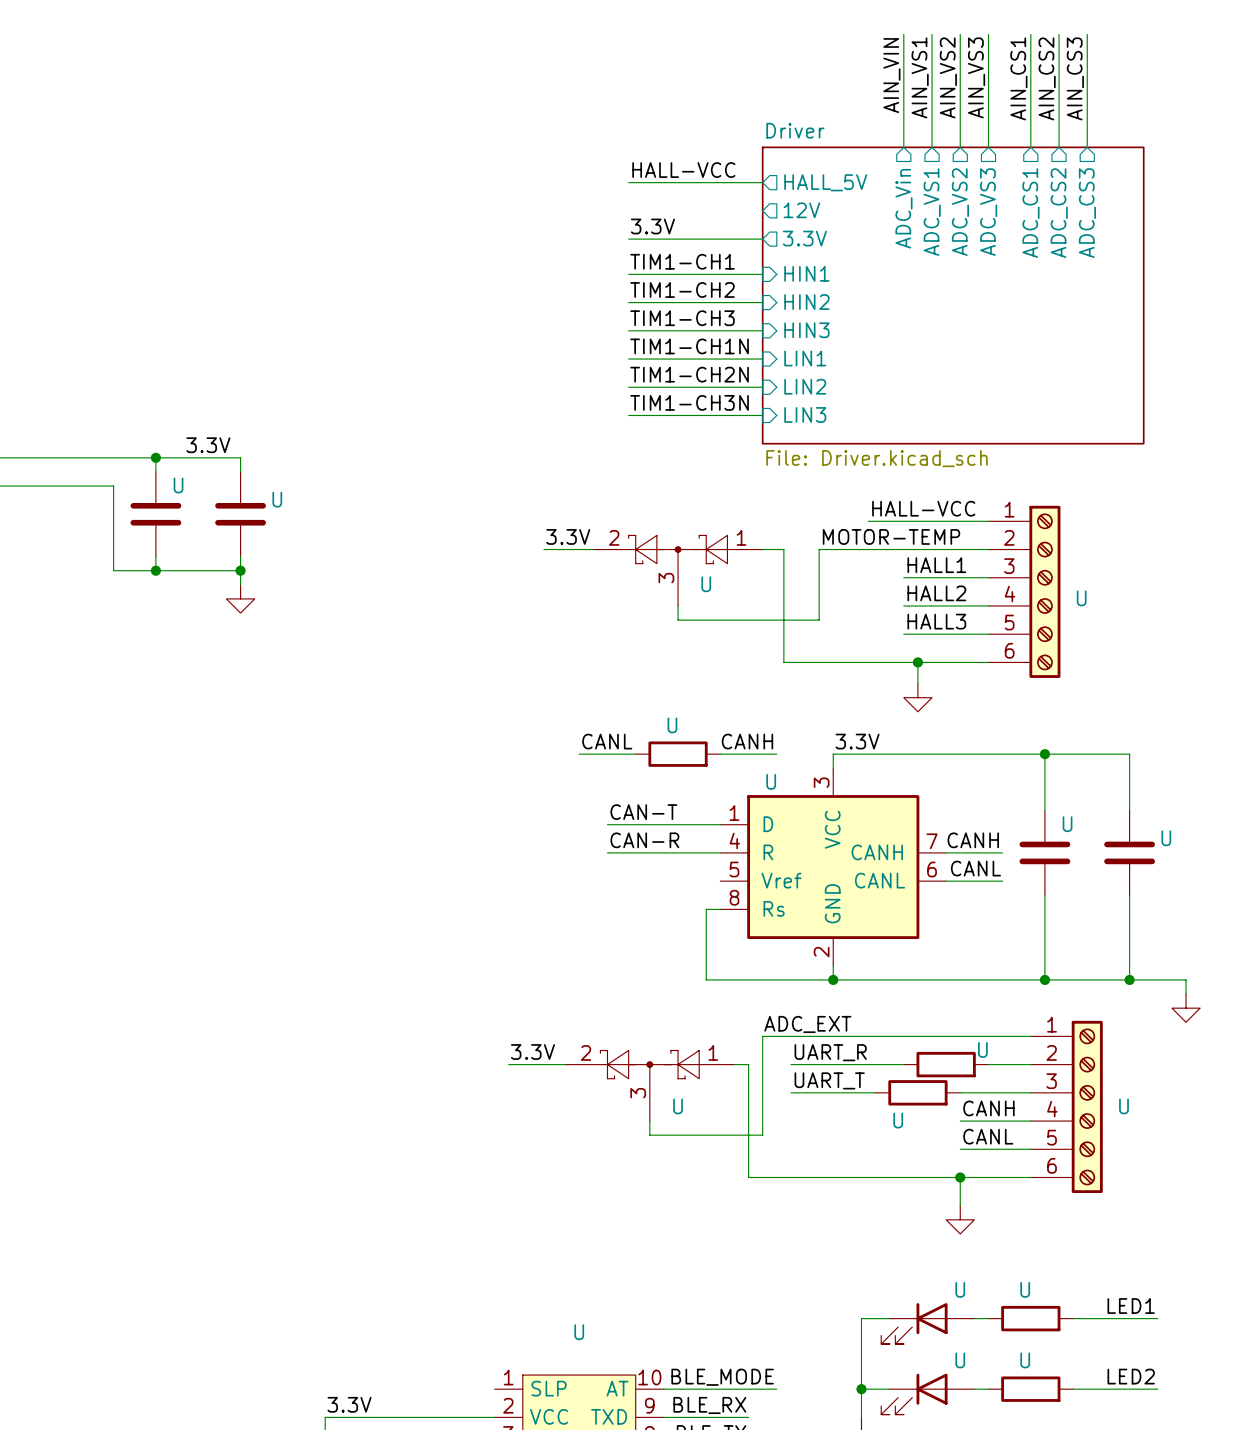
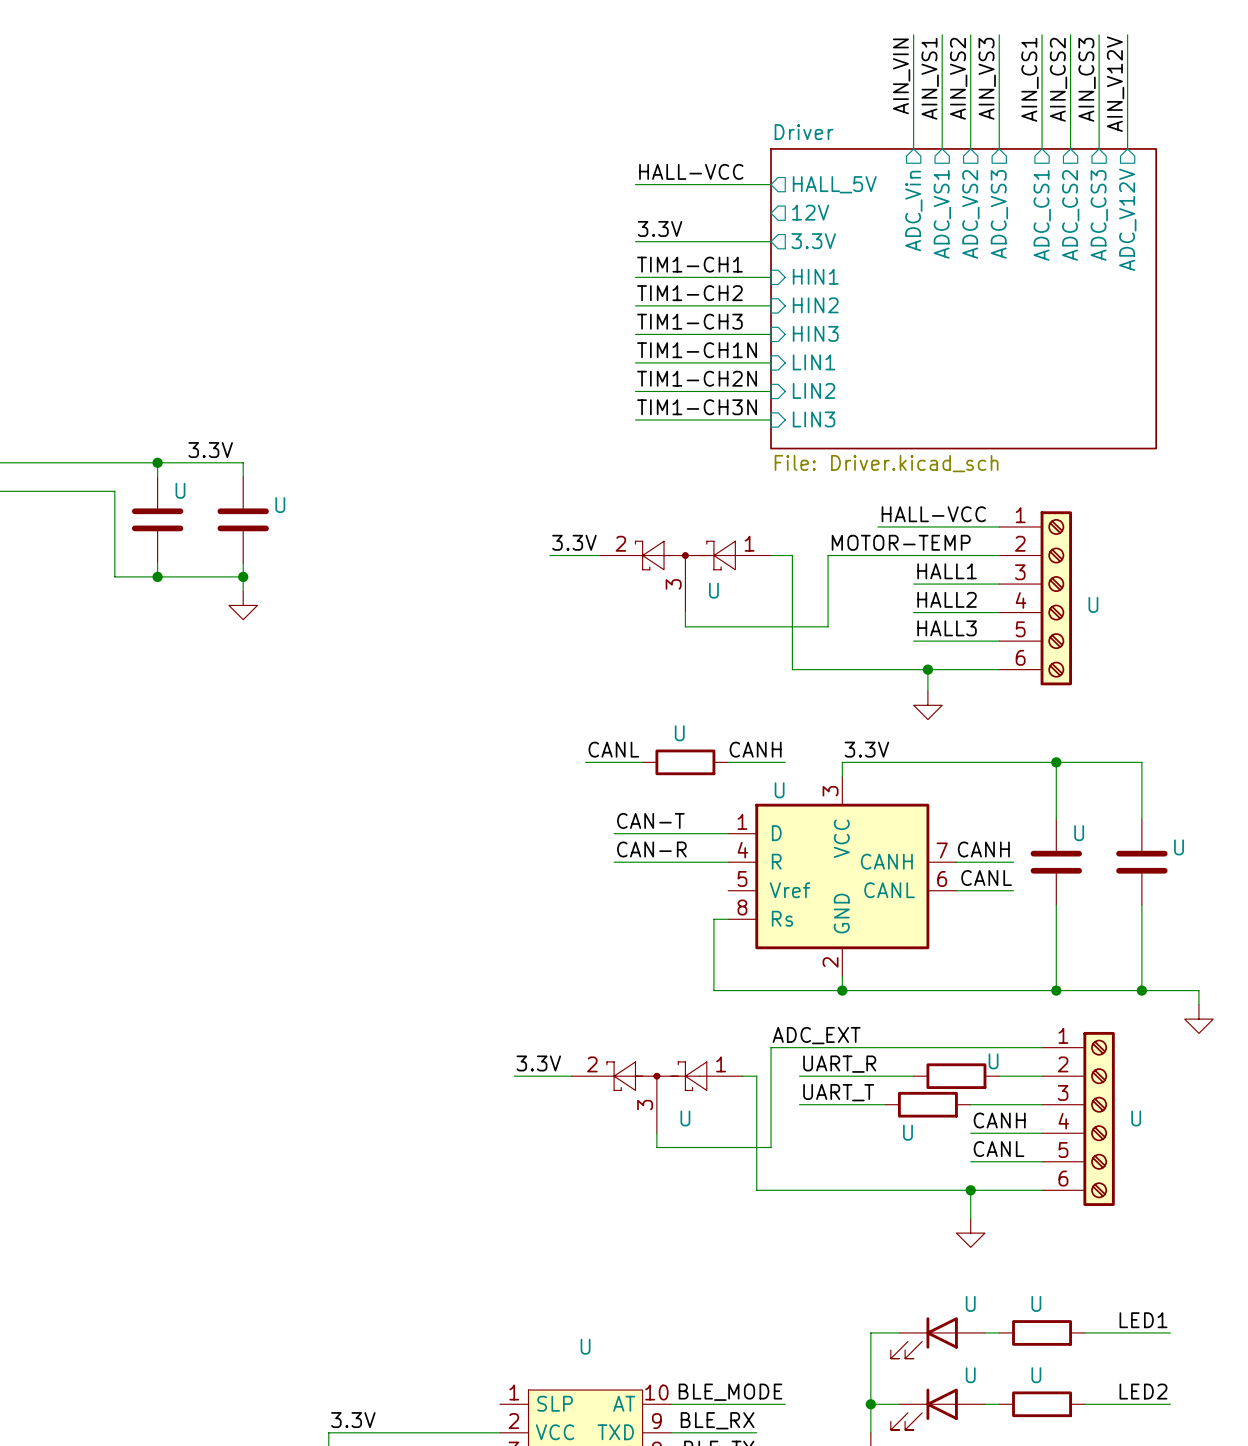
wire: none -> (1127, 34) (1127, 148)
label: none -> AIN_V12V (1115, 84)
sheet pin: none -> ADC_V12V (1127, 219)

